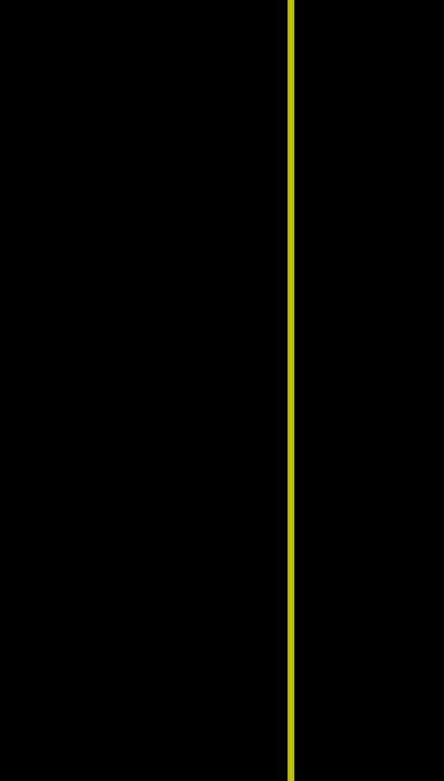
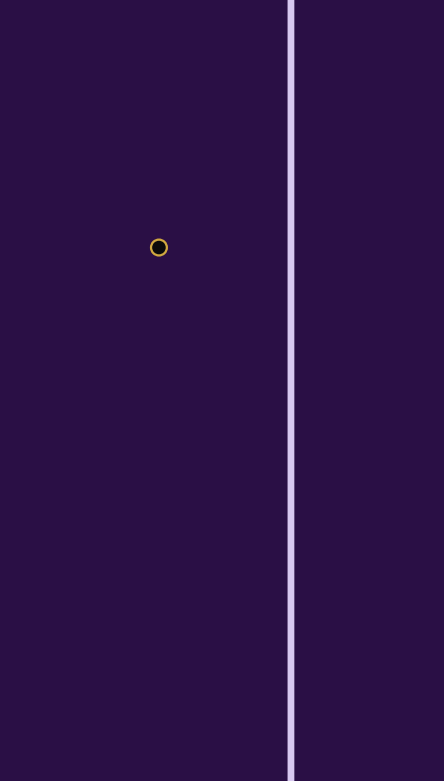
via: none -> (158, 247)

